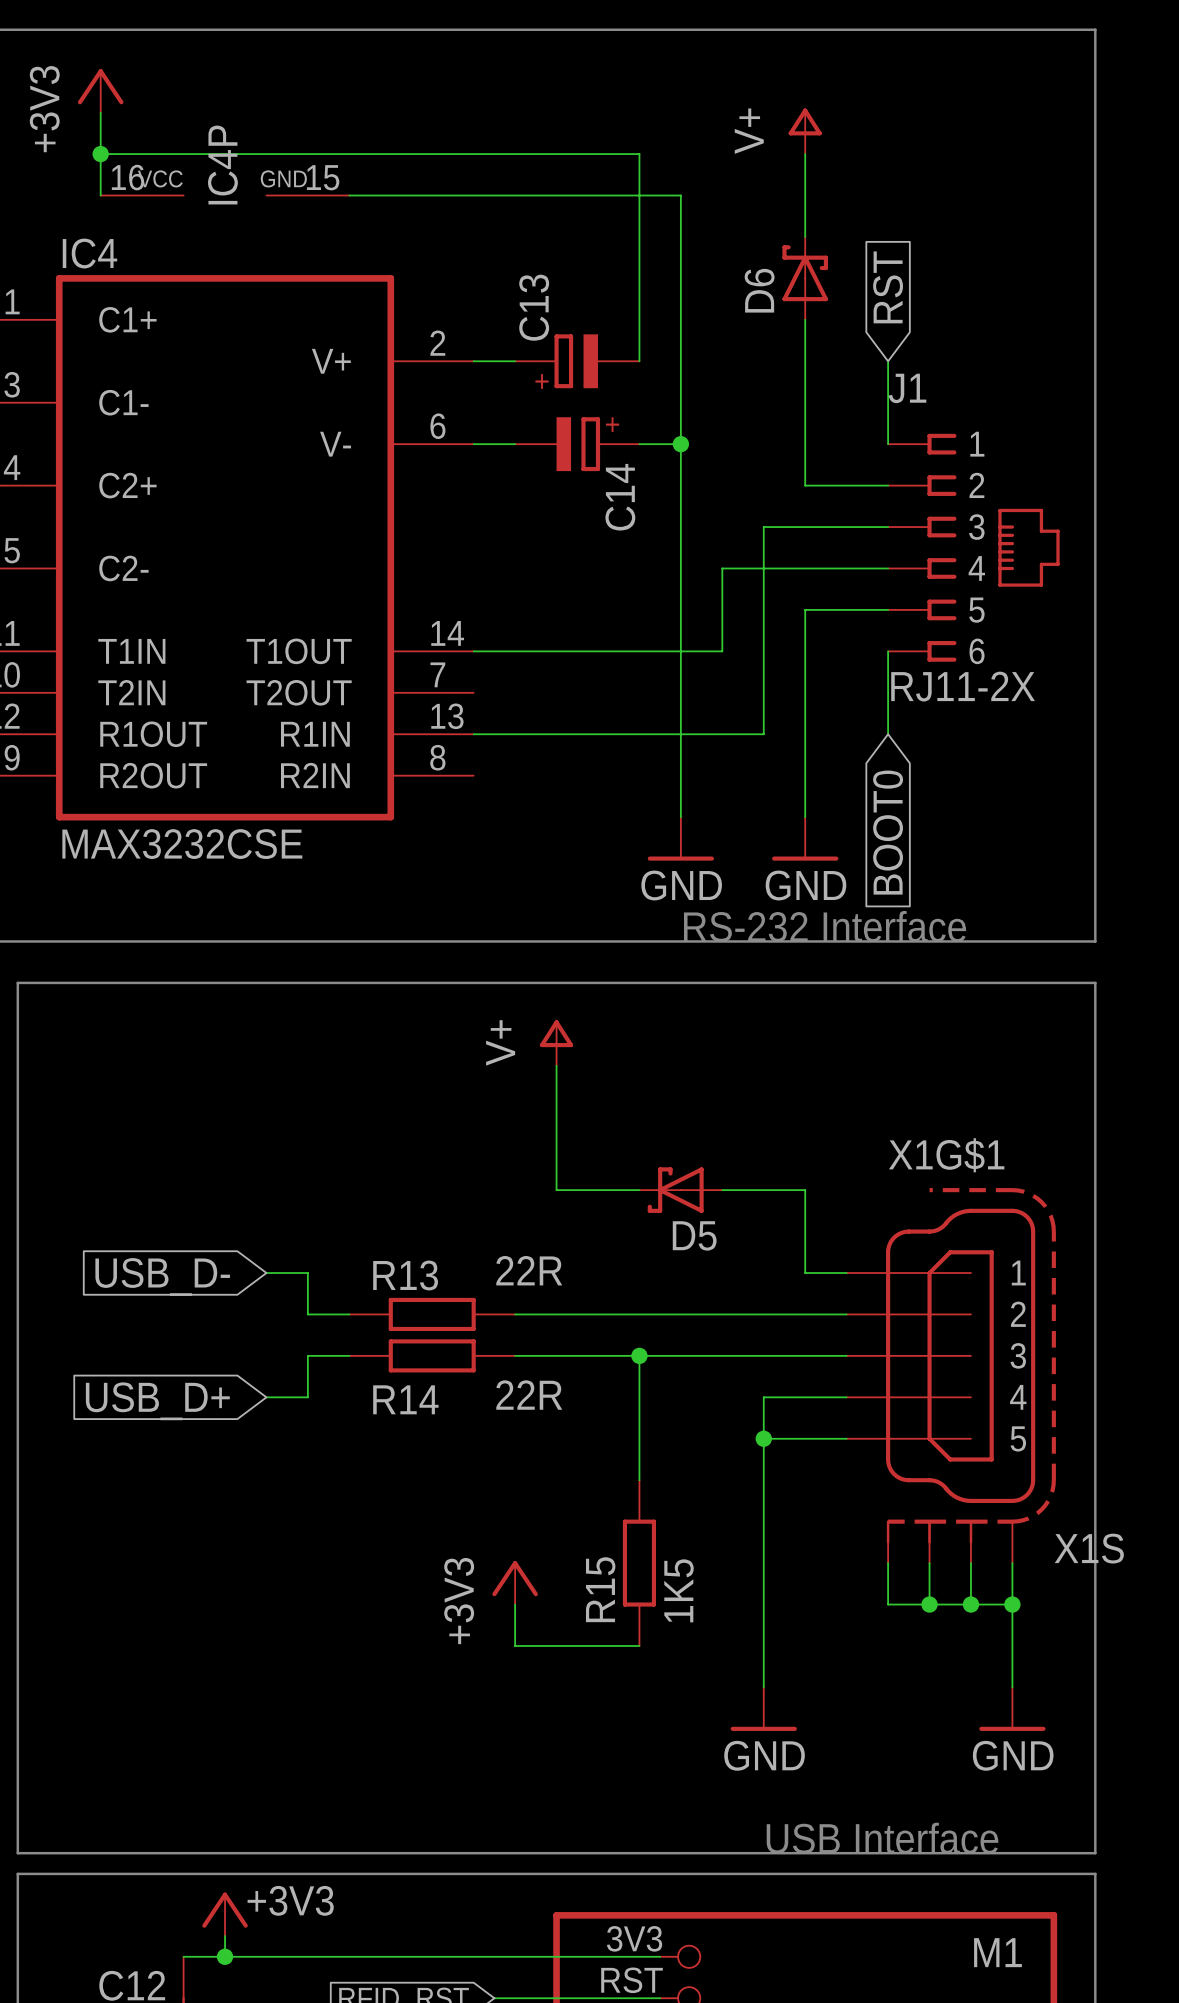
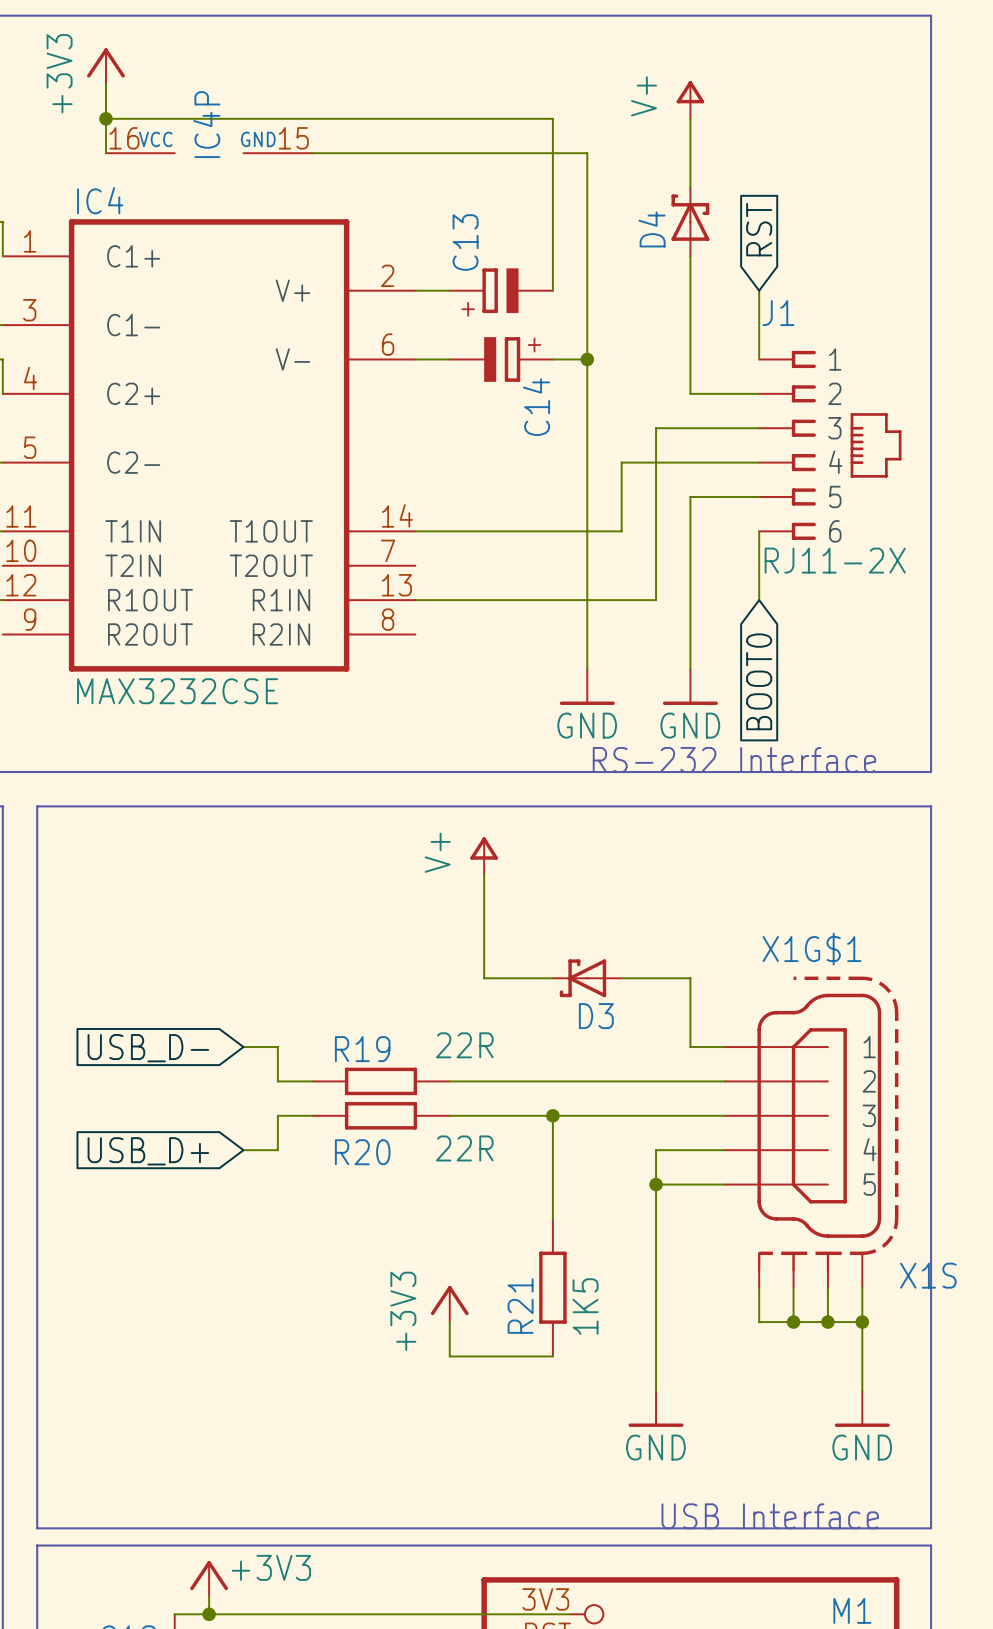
D6 name: D6 (759, 290) -> D4 (652, 229)
D5 name: D5 (694, 1235) -> D3 (596, 1016)
R13 name: R13 (405, 1275) -> R19 (362, 1049)
R14 name: R14 (405, 1399) -> R20 (362, 1152)
R15 name: R15 (600, 1589) -> R21 (520, 1306)

